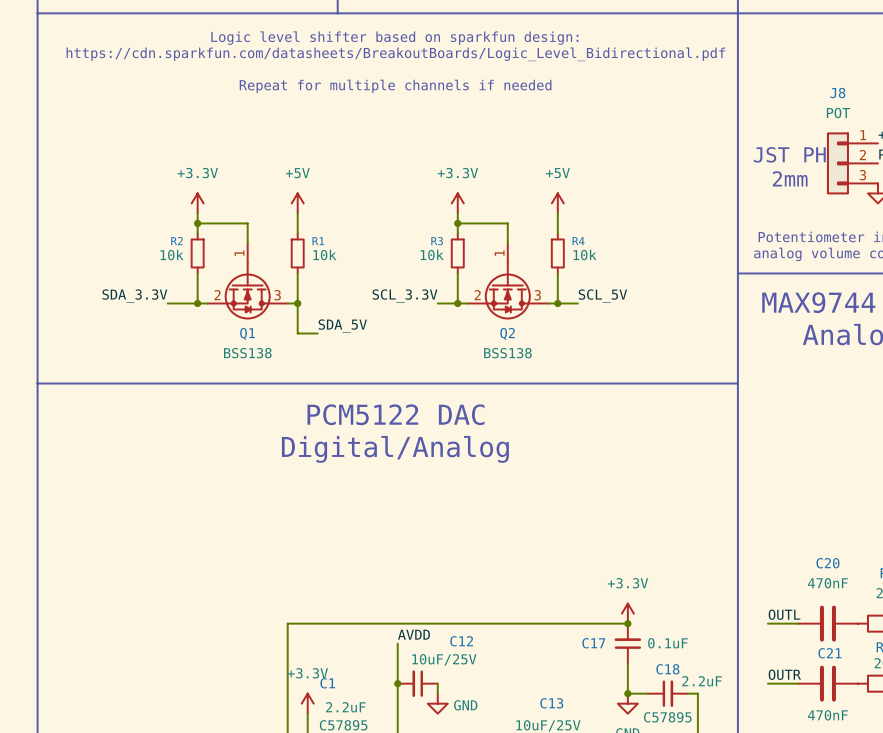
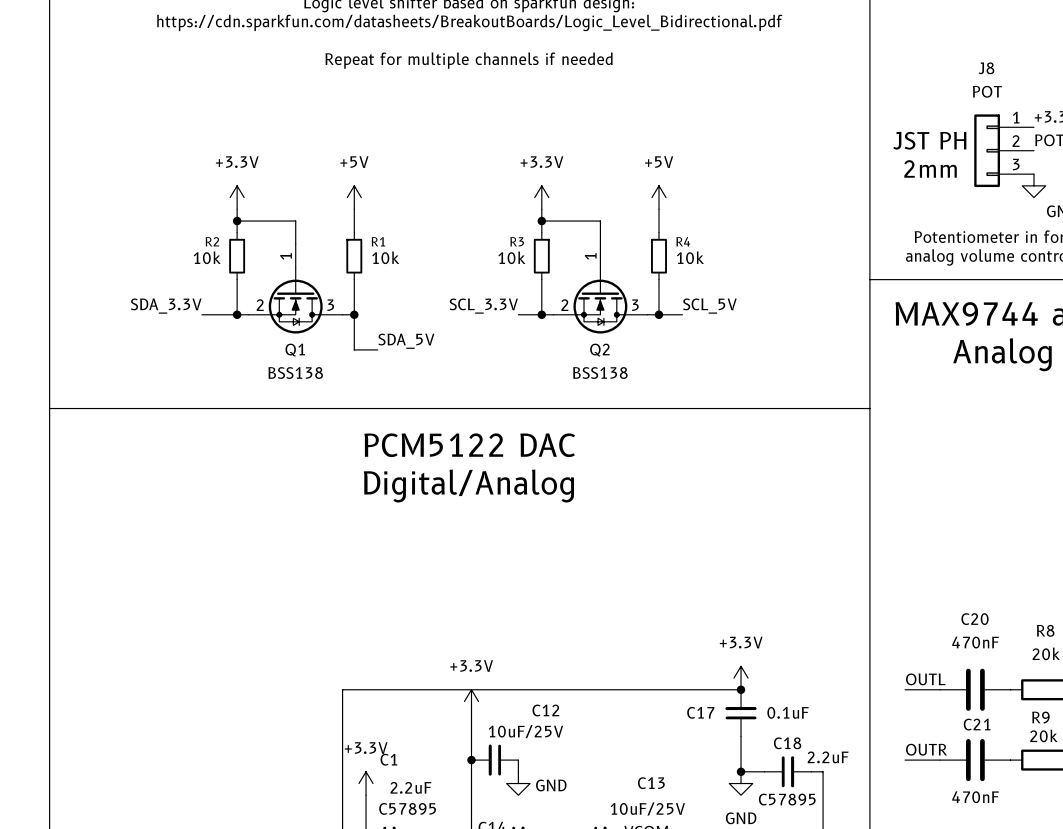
power symbol: none -> +3.3V (471, 701)
label: AVDD (413, 634) -> none

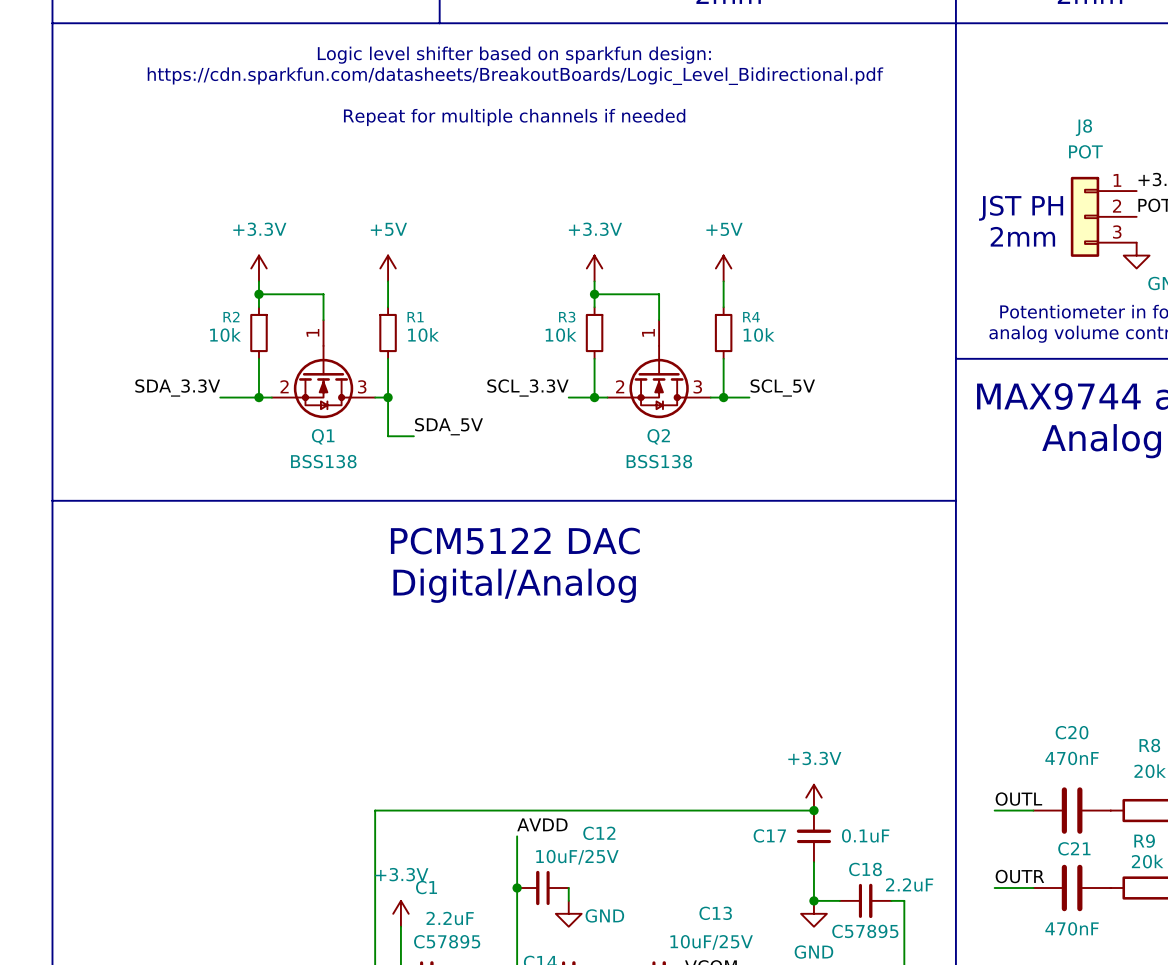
power symbol: +3.3V (471, 701) -> none
label: none -> AVDD (542, 824)

